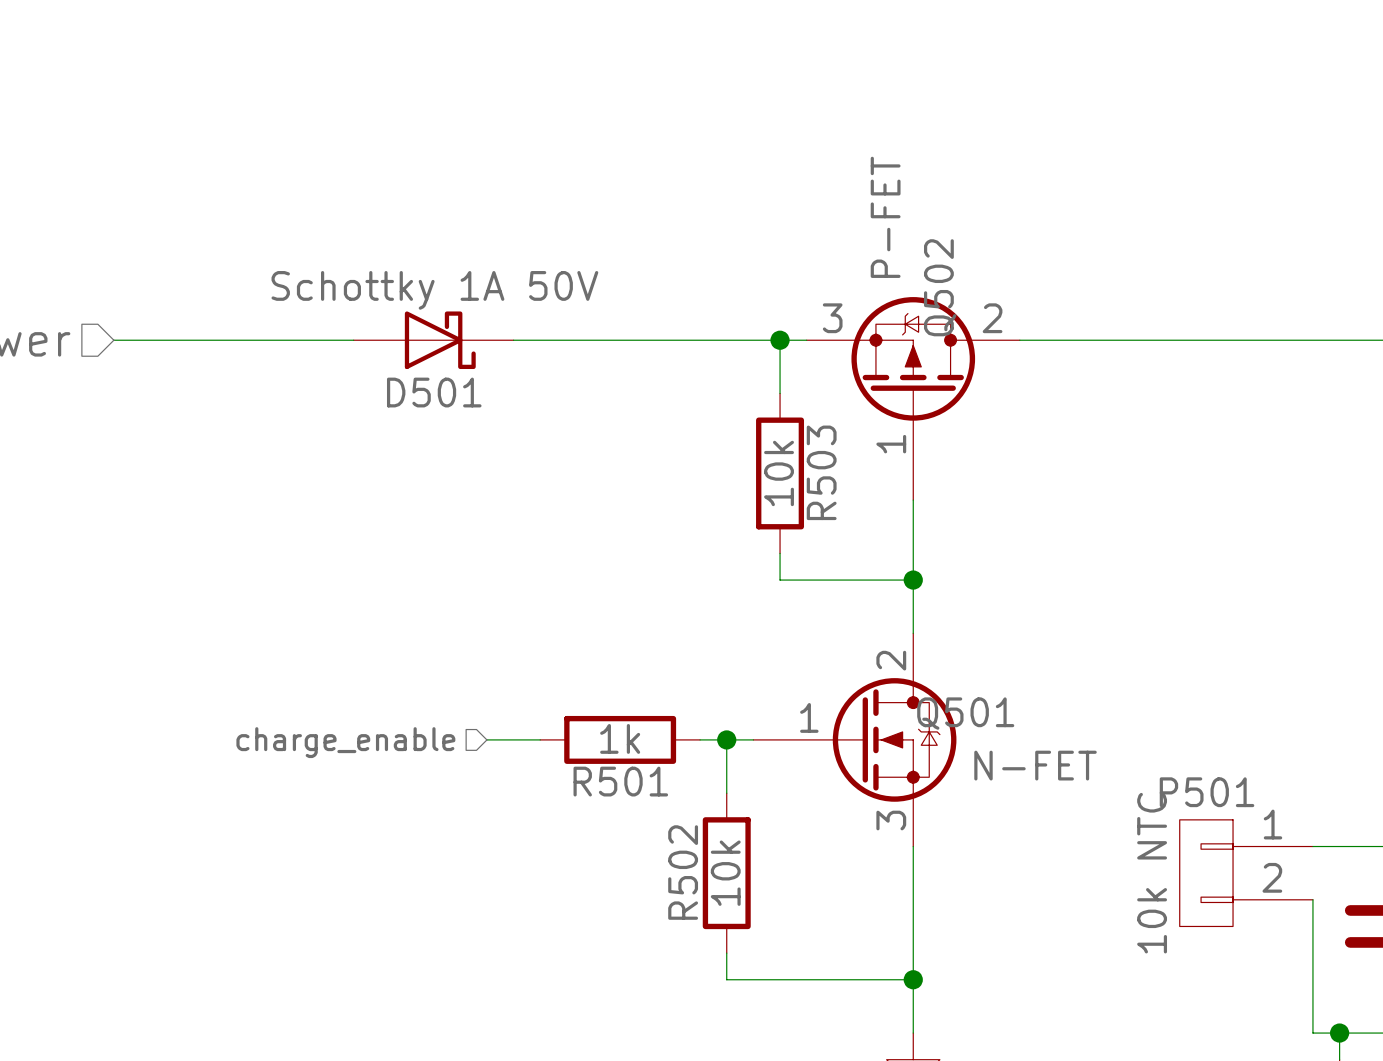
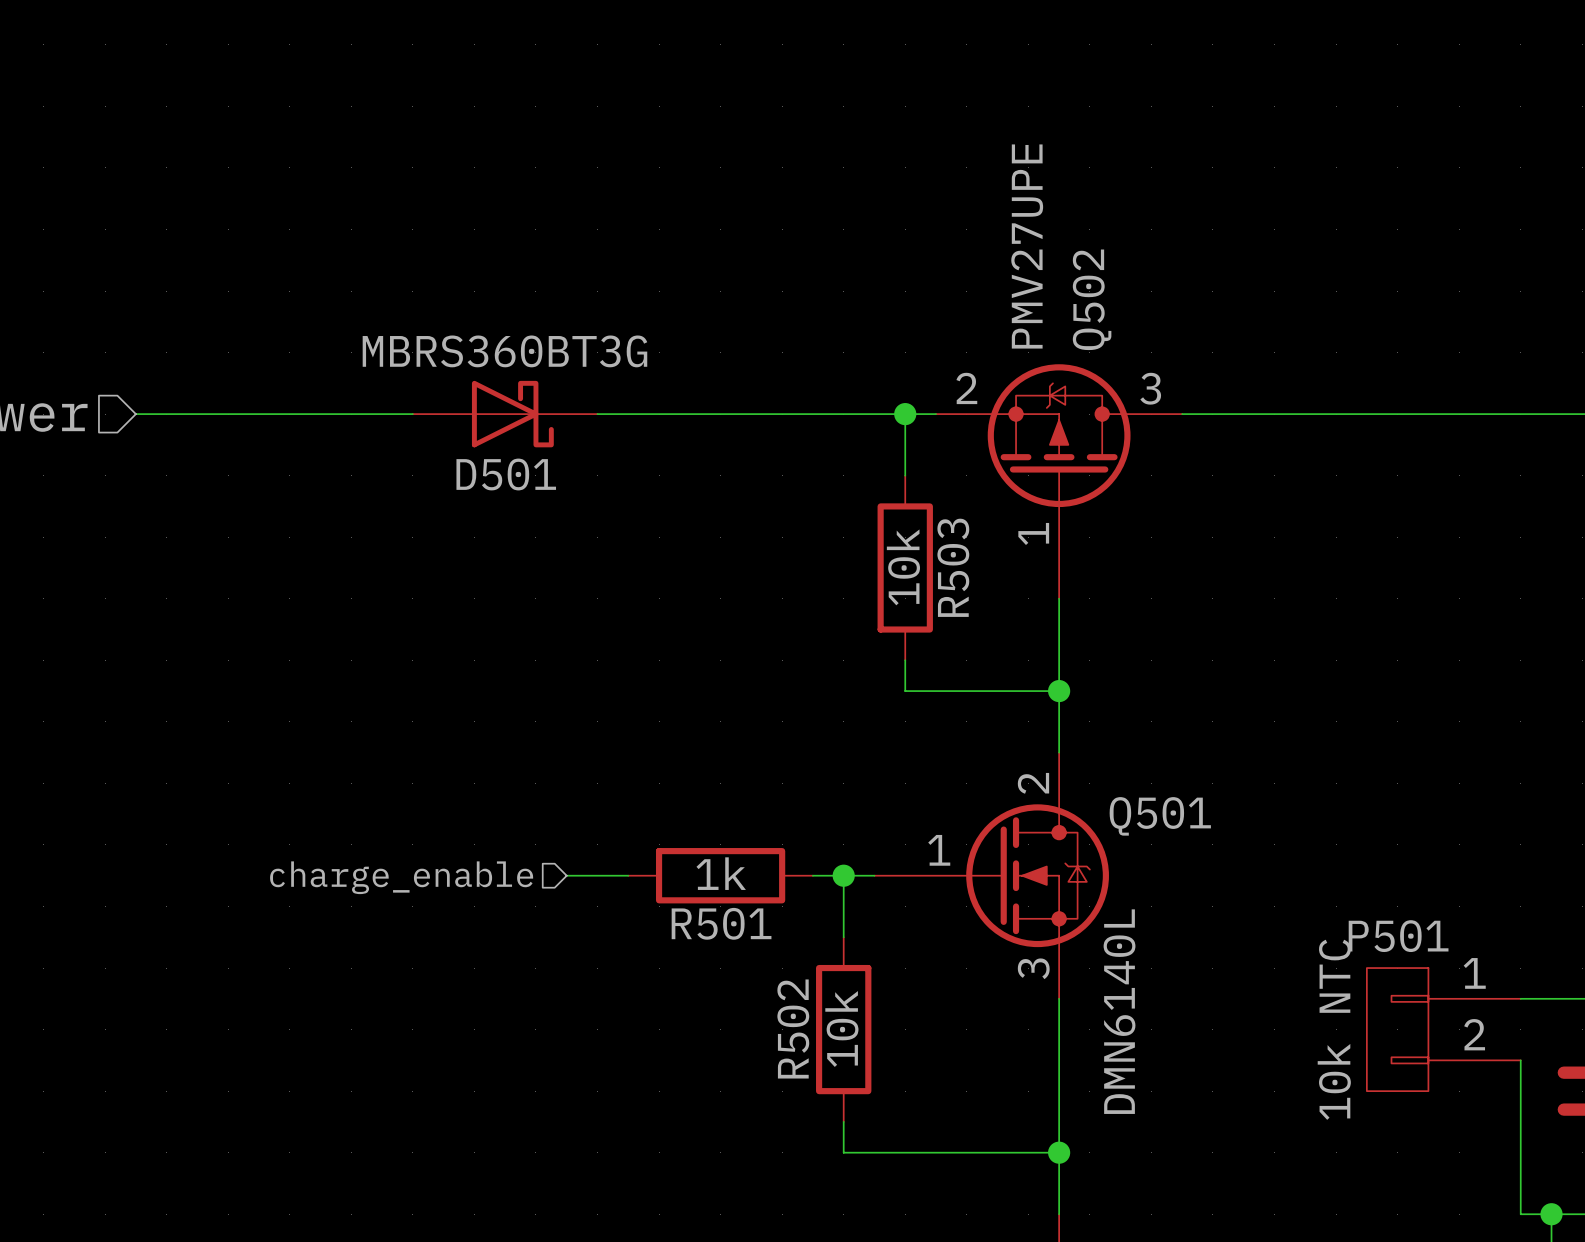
Q502 value: P-FET (885, 217) -> PMV27UPE (1027, 246)
Q502 name position: Q502 (940, 287) -> Q502 (1092, 299)
D501 value: Schottky 1A 50V (434, 290) -> MBRS360BT3G (504, 351)
Q502 pin number: 3 (832, 318) -> 2 (966, 388)
Q502 pin number: 2 (992, 318) -> 3 (1150, 388)
Q501 name position: Q501 (965, 713) -> Q501 (1160, 816)
Q501 value: N-FET (1035, 765) -> DMN6140L (1119, 1011)

